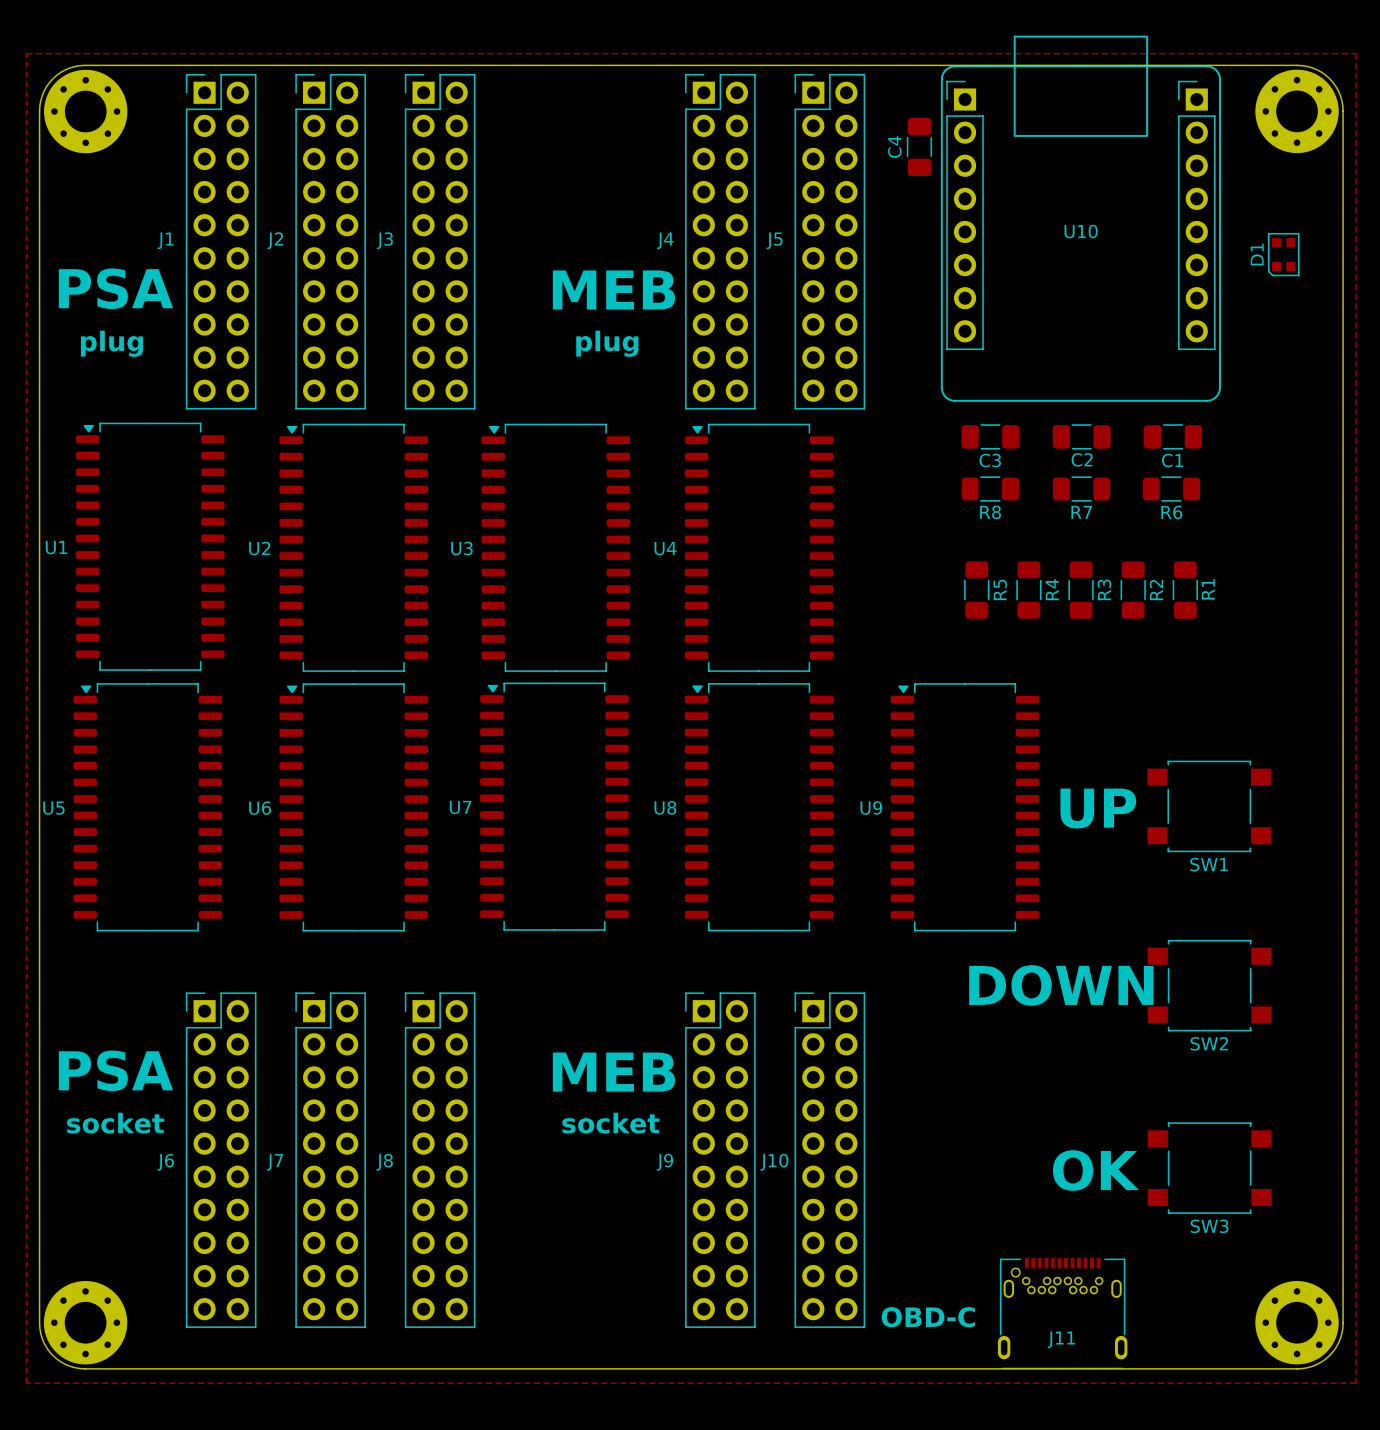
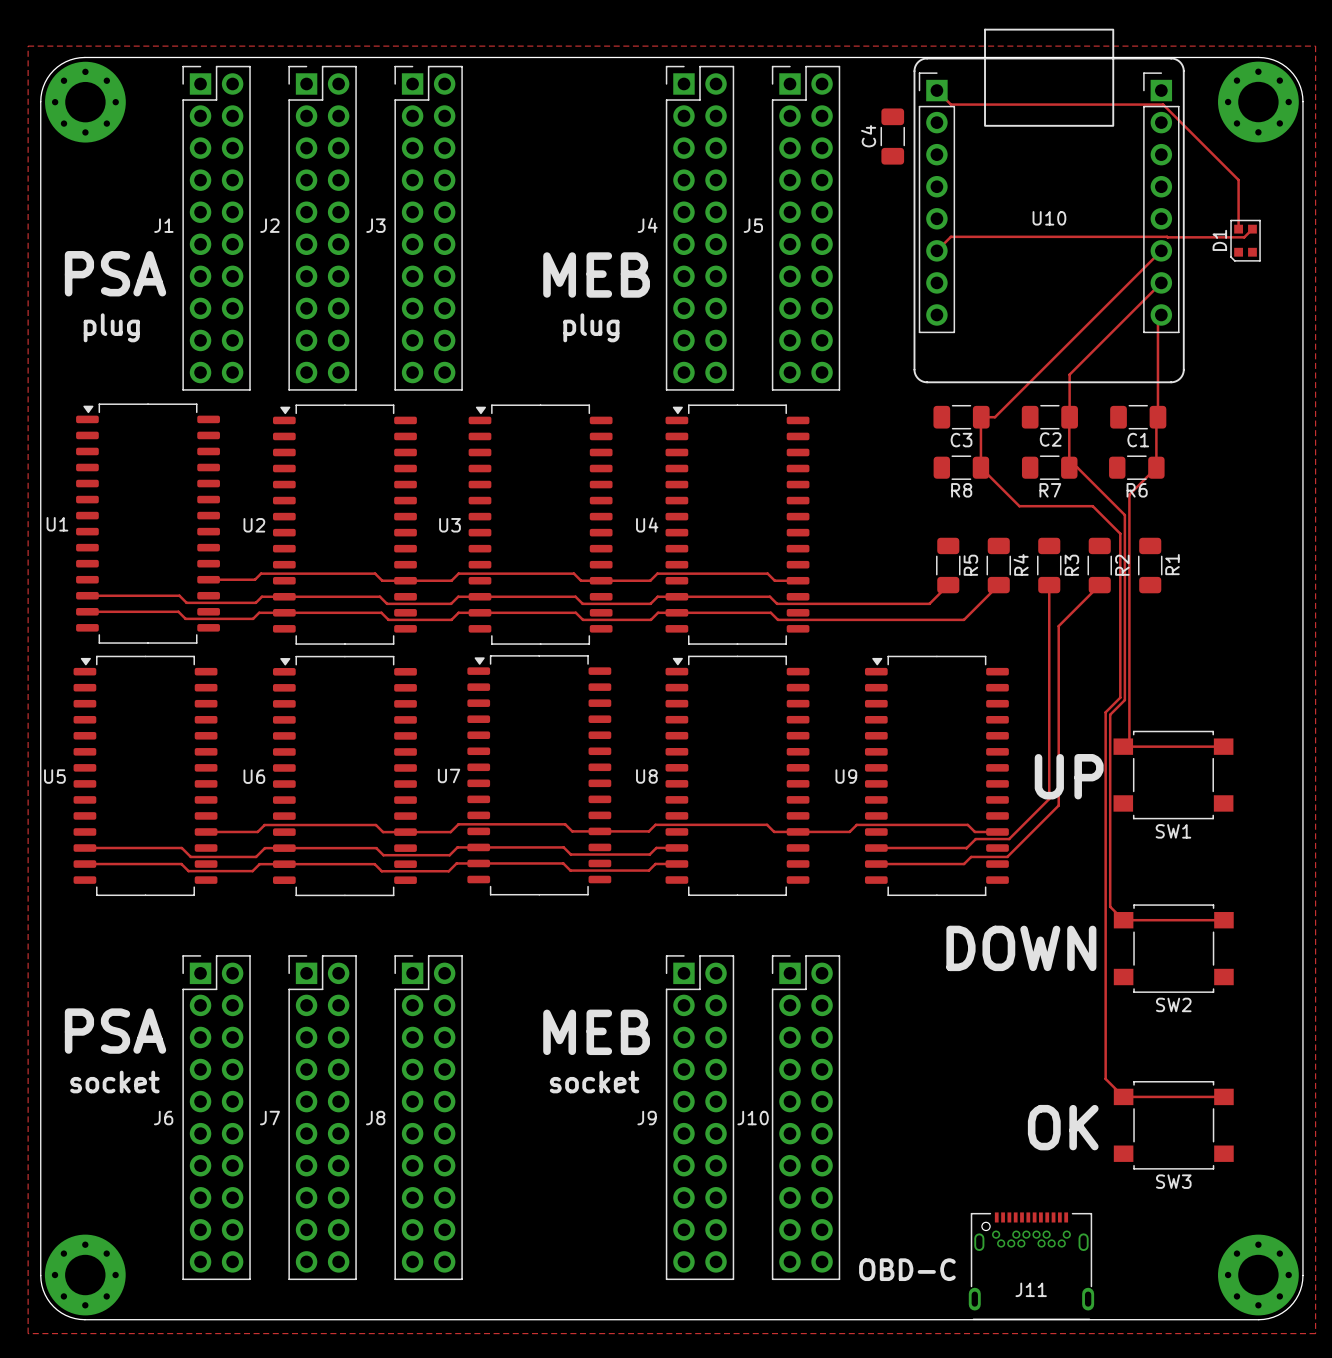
track: none -> (936, 90) (950, 104) (1163, 104) (1238, 180) (1238, 229)
track: none -> (1252, 229) (1244, 237) (950, 236) (936, 250)
track: none -> (1161, 250) (994, 417) (980, 417) (980, 467) (1019, 506) (1092, 506) (1120, 533) (1120, 697) (1105, 712) (1105, 1078) (1123, 1096) (1223, 1096)
track: none -> (1161, 282) (1069, 374) (1069, 467) (1077, 467) (1124, 515) (1124, 700) (1110, 714) (1110, 906) (1123, 920) (1223, 920)
track: none -> (1161, 314) (1157, 318) (1156, 467) (1129, 494) (1129, 740) (1123, 746) (1223, 746)
track: none -> (208, 579) (255, 579) (261, 573) (375, 573) (382, 580) (451, 580) (458, 573) (573, 573) (581, 580) (650, 580) (657, 573) (767, 573) (774, 580) (798, 580)
track: none -> (948, 585) (929, 603) (777, 603) (769, 596) (657, 596) (650, 603) (582, 603) (575, 596) (458, 596) (451, 603) (387, 603) (379, 596) (261, 596) (255, 602) (186, 602) (179, 595) (87, 595)
track: none -> (998, 585) (963, 619) (777, 619) (770, 612) (658, 612) (650, 619) (582, 619) (575, 612) (458, 612) (451, 619) (388, 619) (381, 612) (259, 612) (253, 618) (185, 618) (178, 611) (87, 611)
track: none -> (1049, 585) (1049, 798) (1009, 839) (975, 839) (966, 848) (876, 848)
track: none -> (1099, 585) (1058, 626) (1058, 805) (1007, 856) (971, 856) (964, 864) (876, 864)
track: none -> (206, 831) (257, 831) (264, 825) (375, 825) (383, 832) (450, 832) (458, 824) (565, 824) (572, 831) (648, 831) (655, 824) (767, 824) (774, 831) (849, 831) (856, 824) (967, 824) (974, 831) (997, 831)
track: none -> (84, 848) (181, 848) (190, 856) (256, 856) (264, 848) (376, 848) (383, 855) (449, 855) (457, 847) (563, 847) (570, 854) (649, 854) (656, 847) (676, 847)
track: none -> (84, 864) (181, 864) (188, 871) (252, 871) (259, 864) (374, 864) (381, 871) (448, 871) (456, 863) (563, 863) (570, 870) (648, 870) (655, 863) (676, 863)

